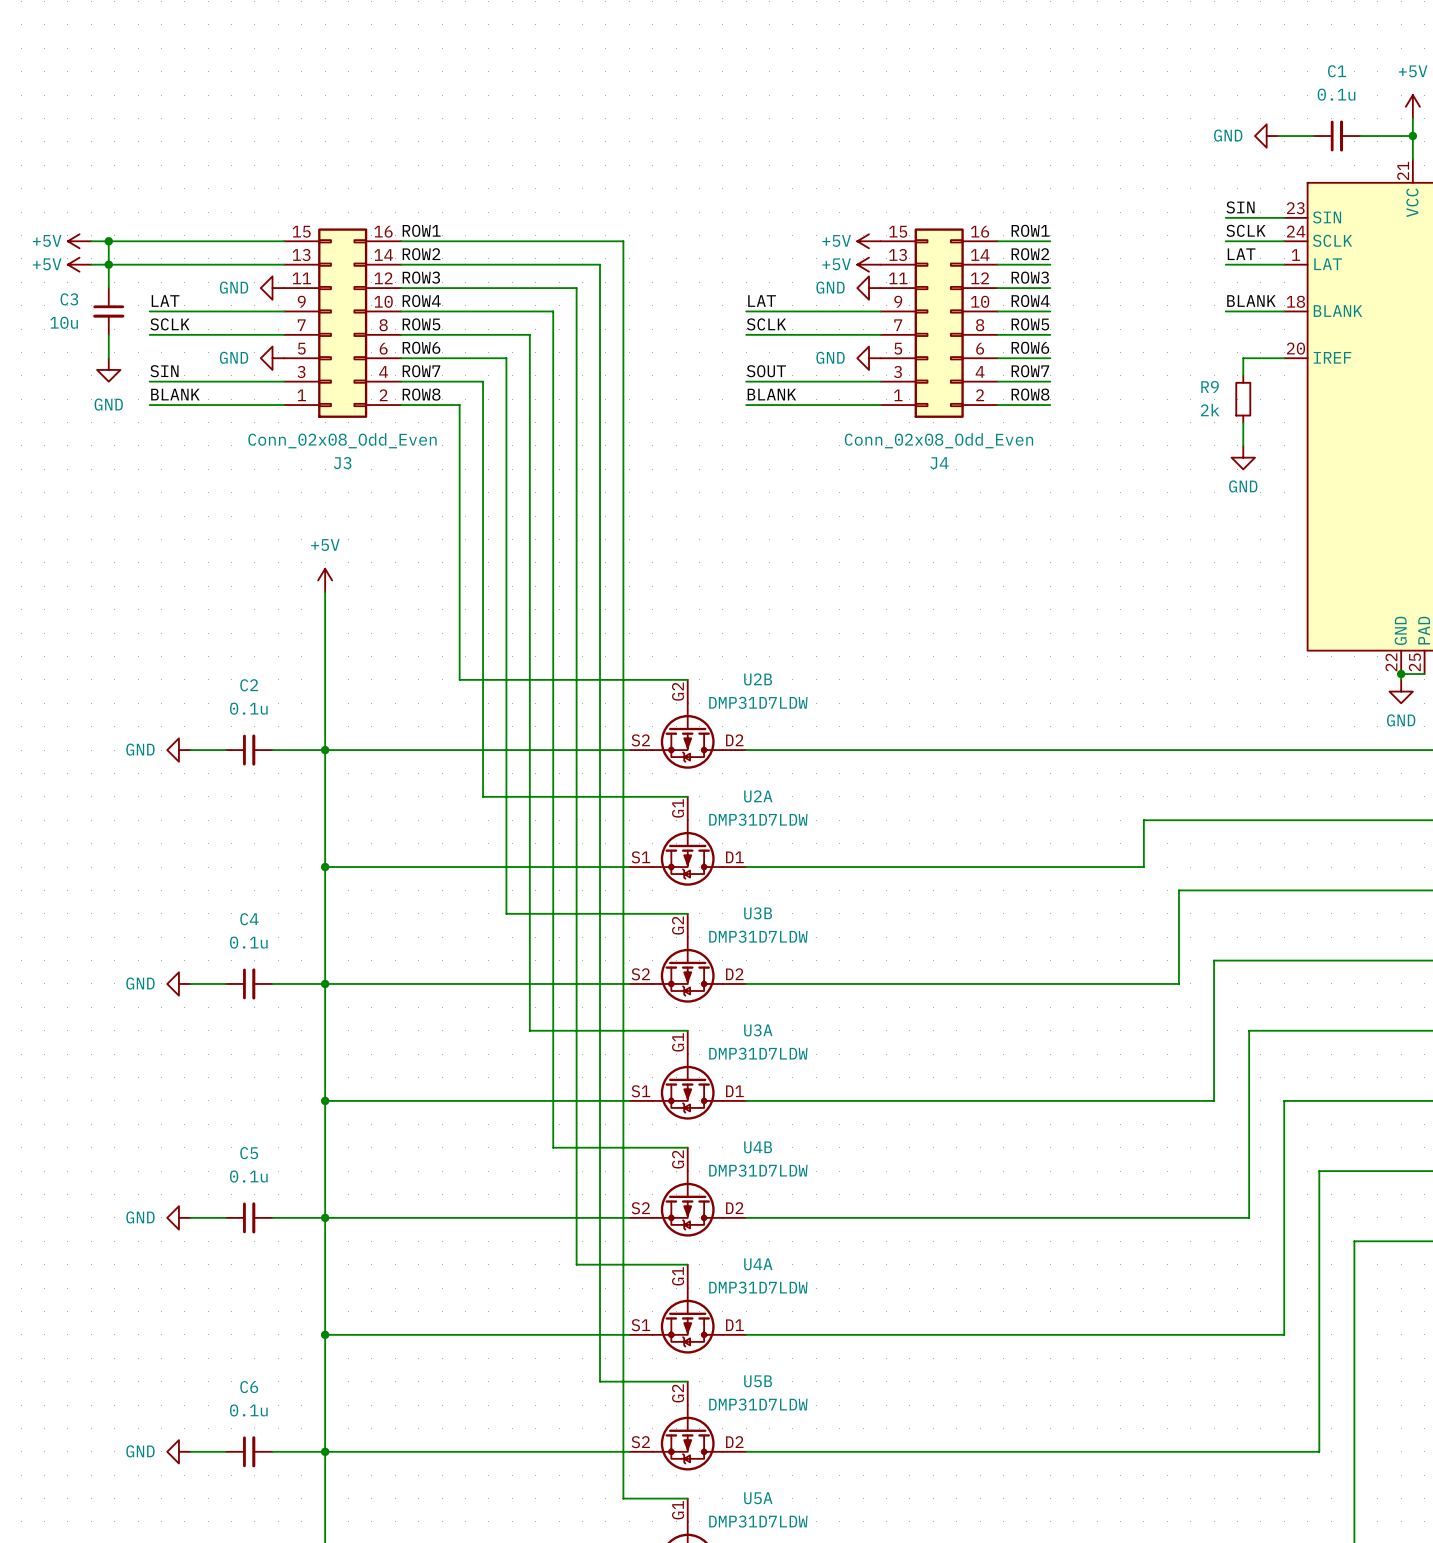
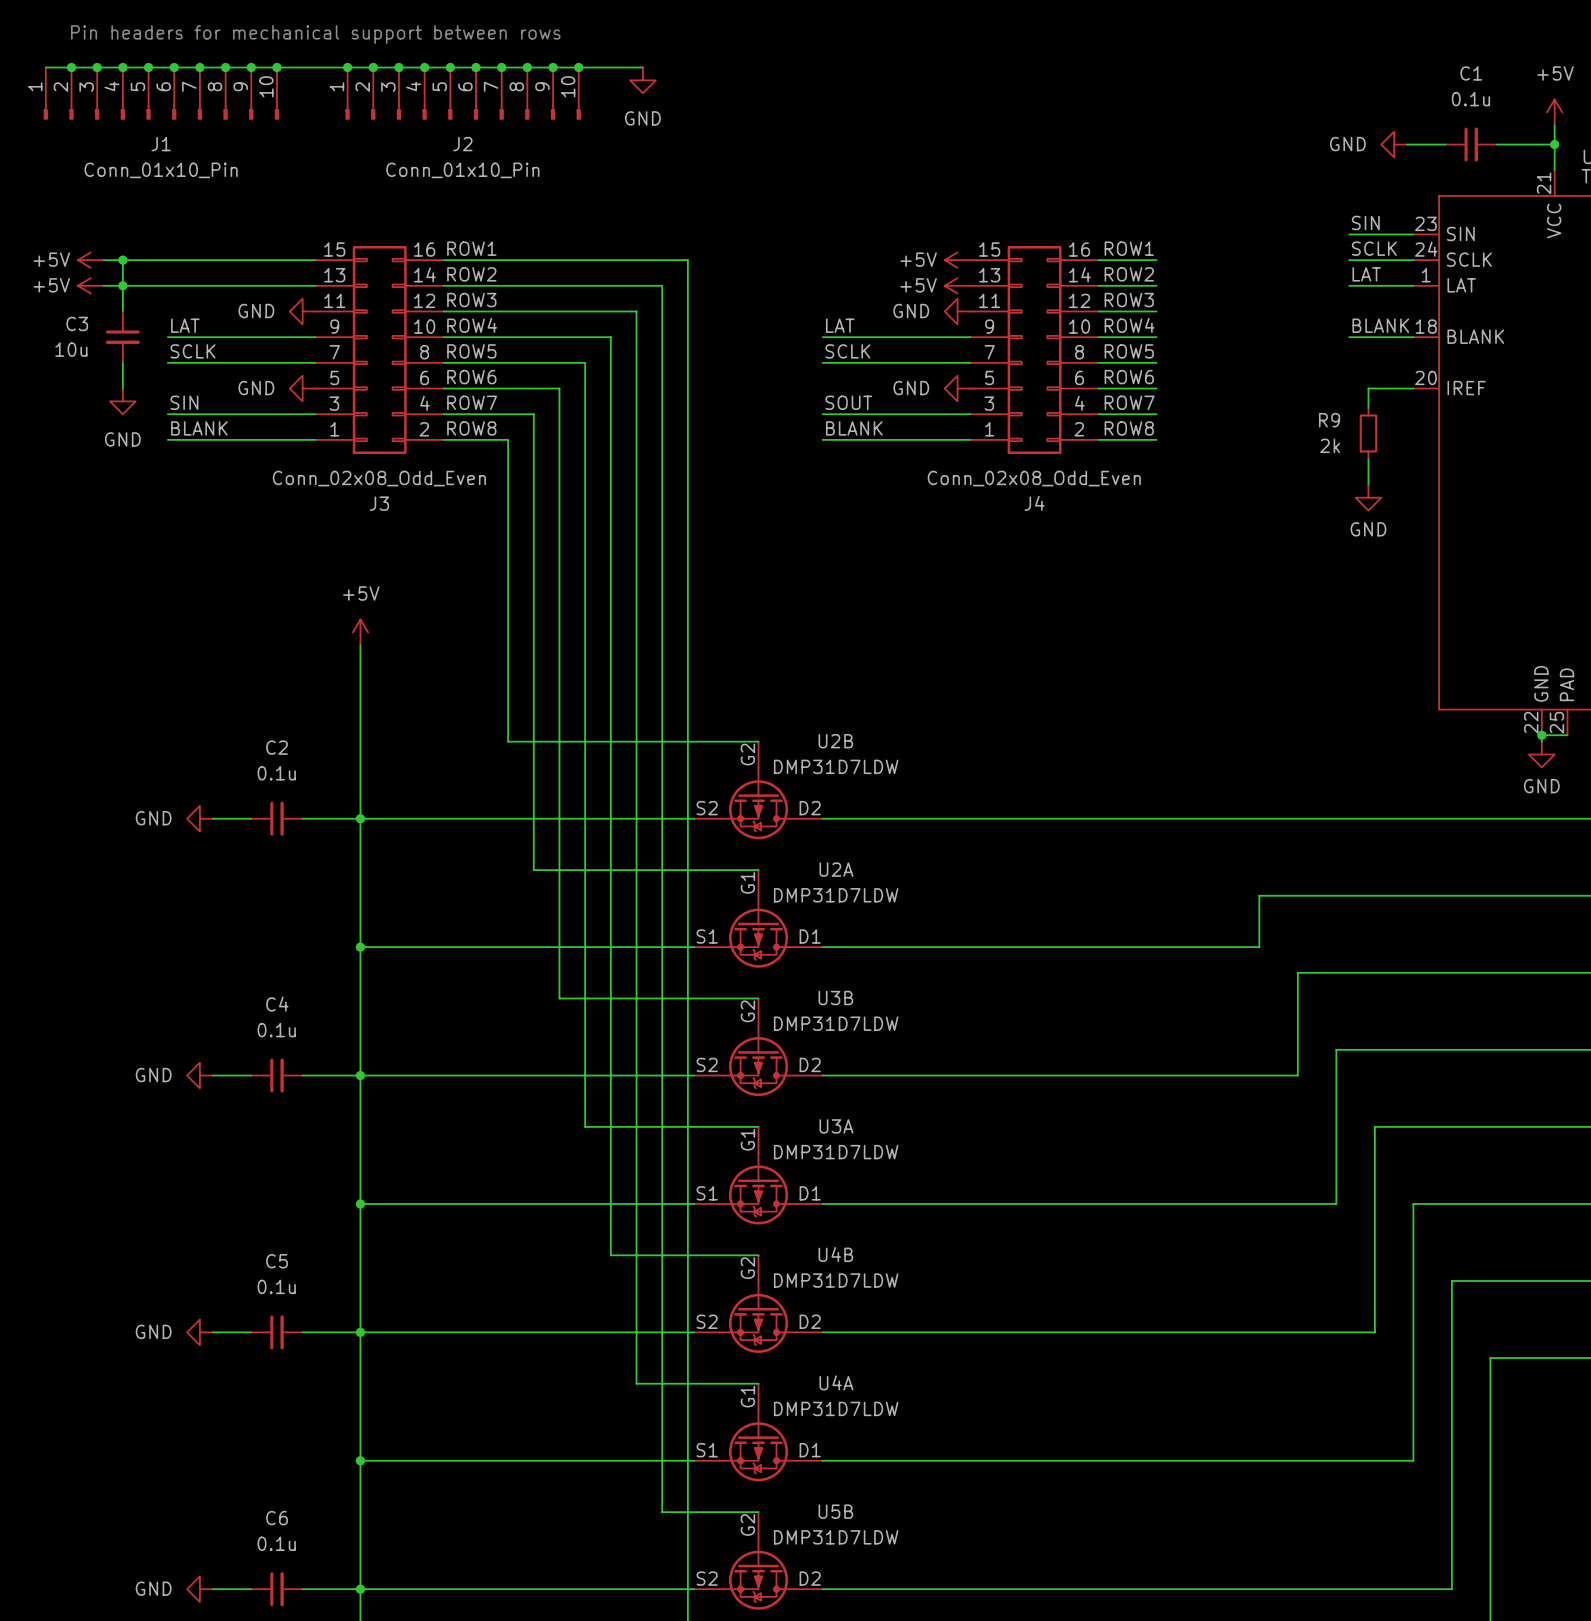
text: none -> Pin headers for mechanical support between rows (315, 34)
wire: none -> (45, 67) (642, 67)
junction: none -> (71, 67)
junction: none -> (97, 67)
junction: none -> (122, 67)
junction: none -> (148, 67)
junction: none -> (174, 67)
junction: none -> (199, 67)
junction: none -> (225, 67)
junction: none -> (251, 67)
junction: none -> (276, 67)
junction: none -> (347, 67)
junction: none -> (373, 67)
junction: none -> (398, 67)
junction: none -> (424, 67)
junction: none -> (450, 67)
junction: none -> (476, 67)
junction: none -> (501, 67)
junction: none -> (527, 67)
junction: none -> (553, 67)
junction: none -> (578, 67)
power symbol: none -> GND (642, 80)
J1: none -> Conn_01x10_Pin (161, 93)
J2: none -> Conn_01x10_Pin (463, 93)

